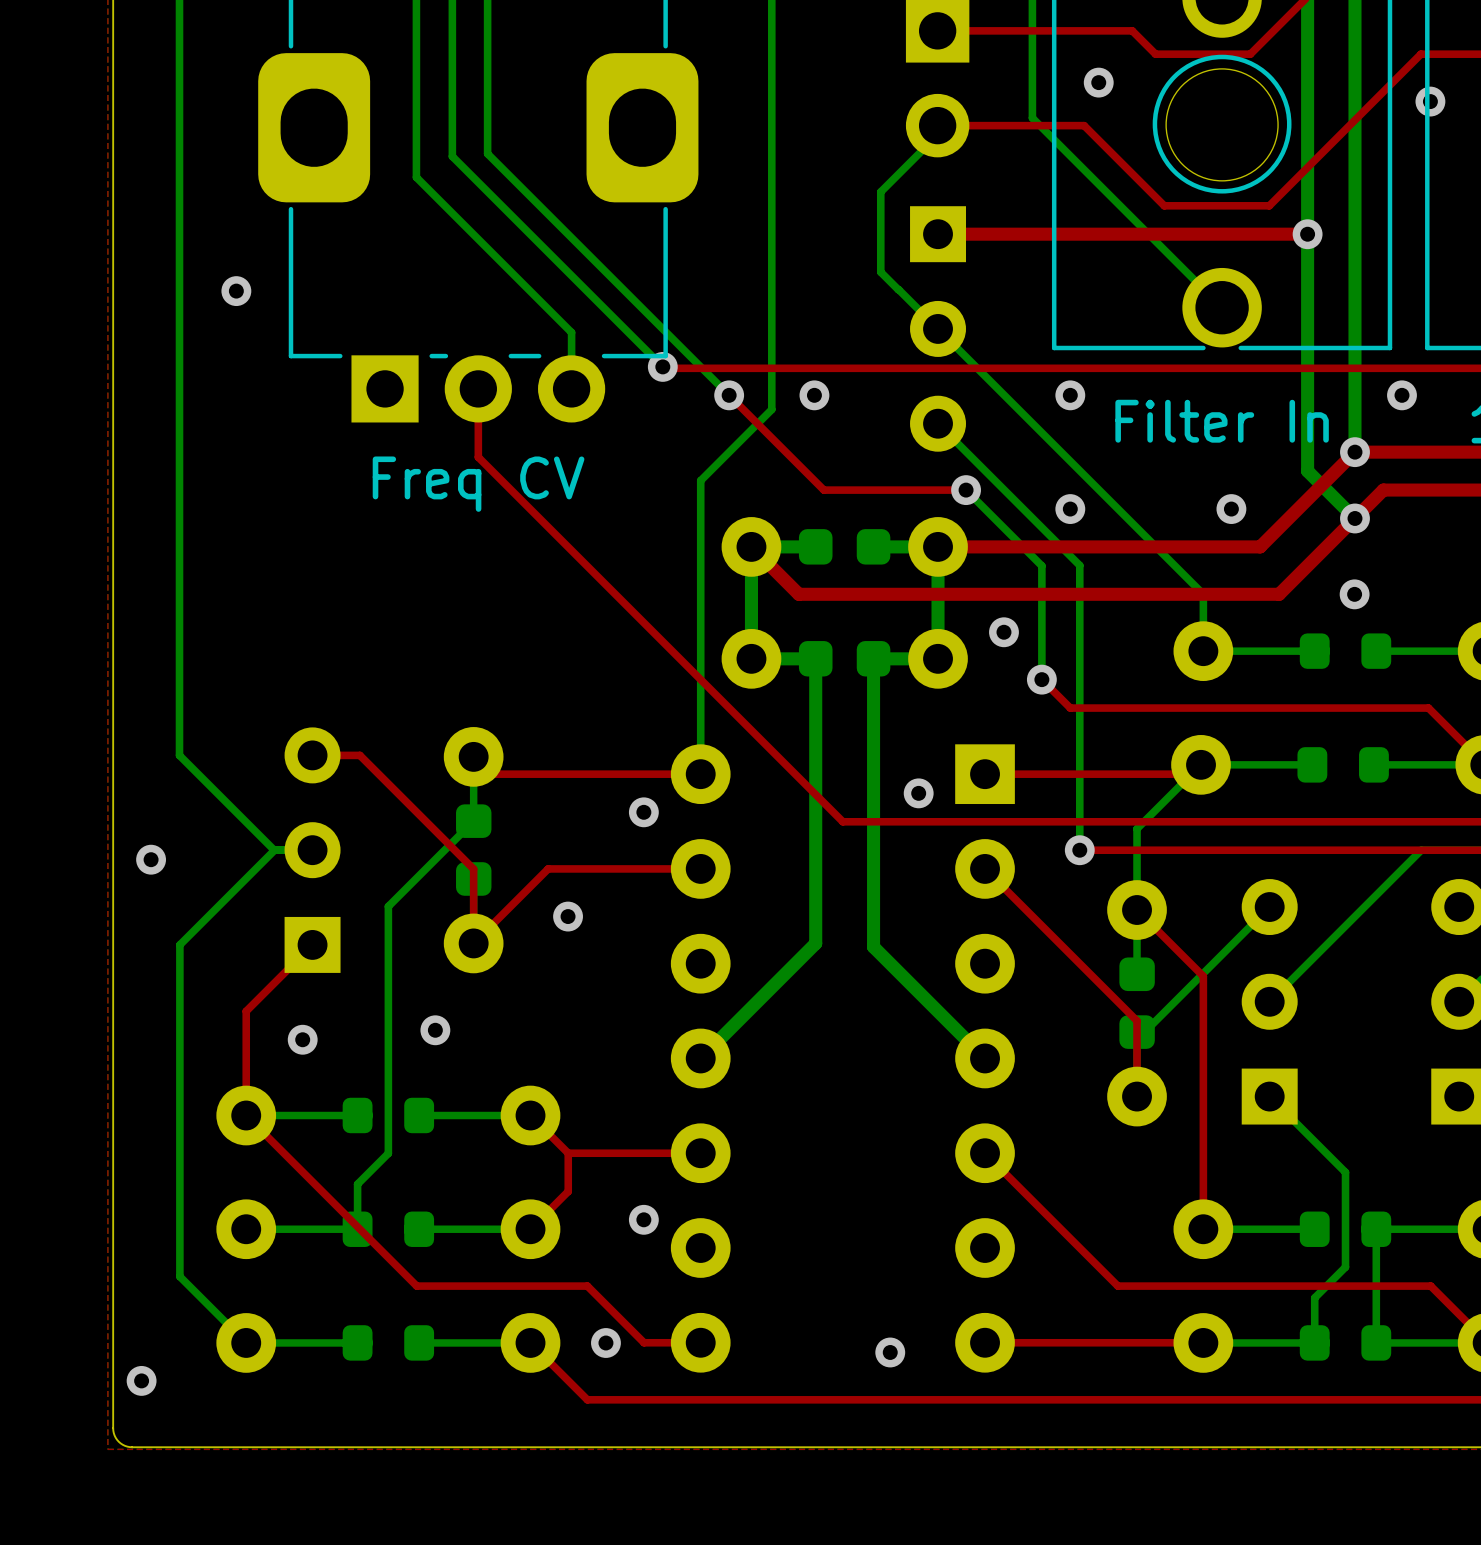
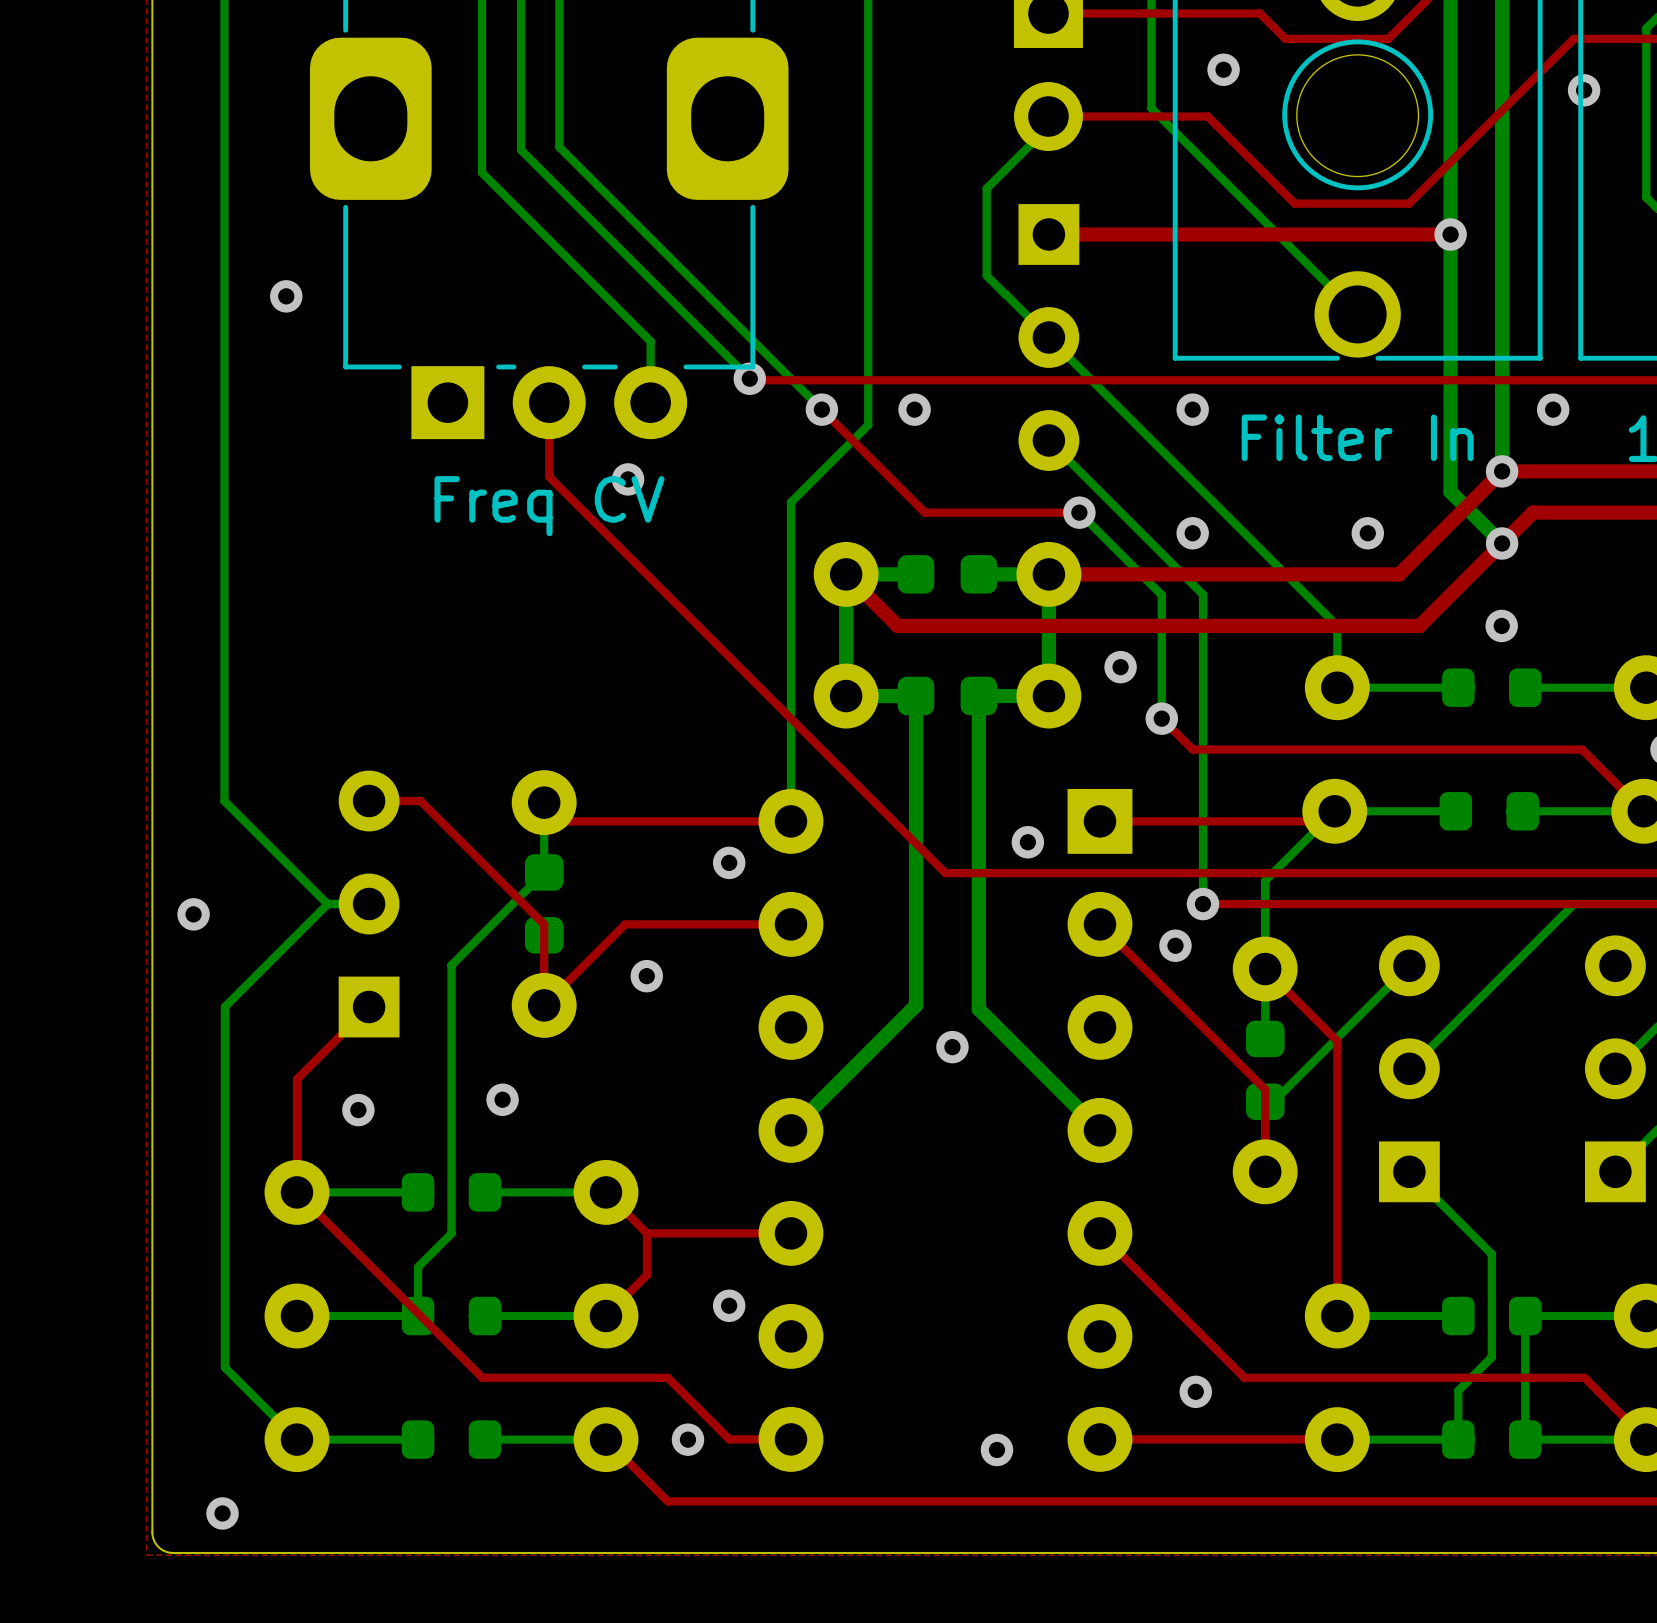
via: none -> (628, 479)
via: none -> (1175, 945)
via: none -> (952, 1047)
via: none -> (1195, 1391)
via position: (141, 1380) -> (222, 1513)

